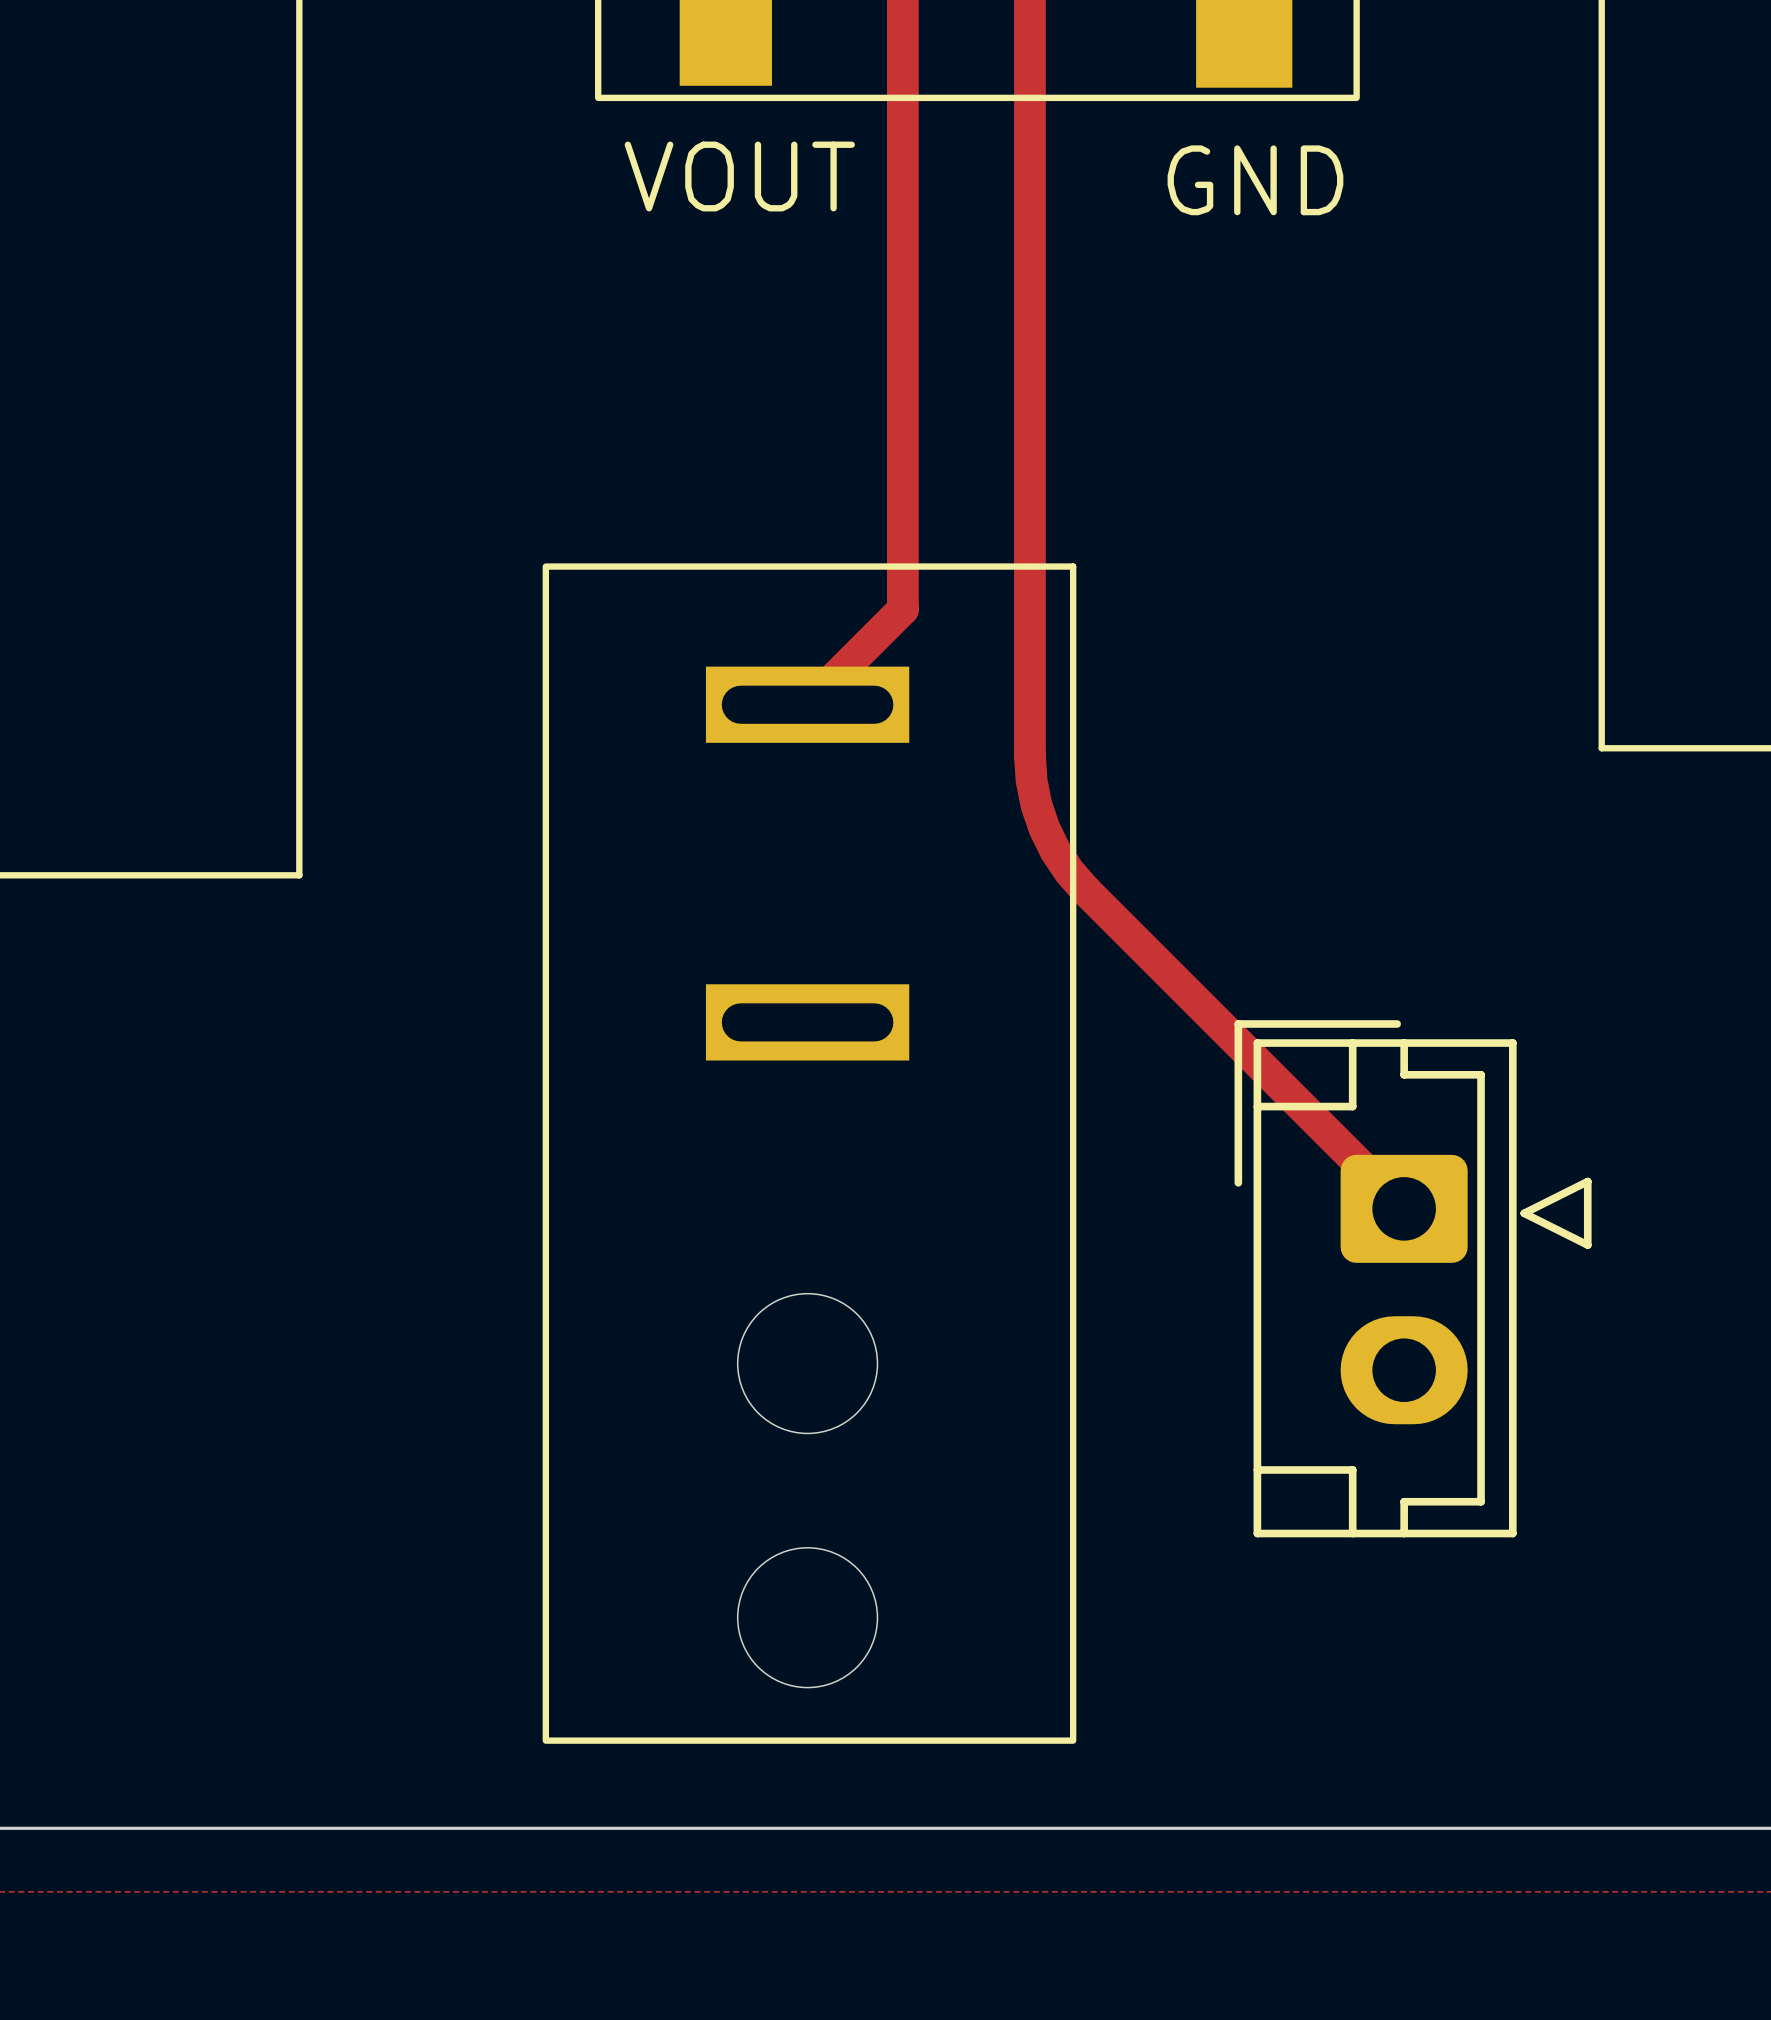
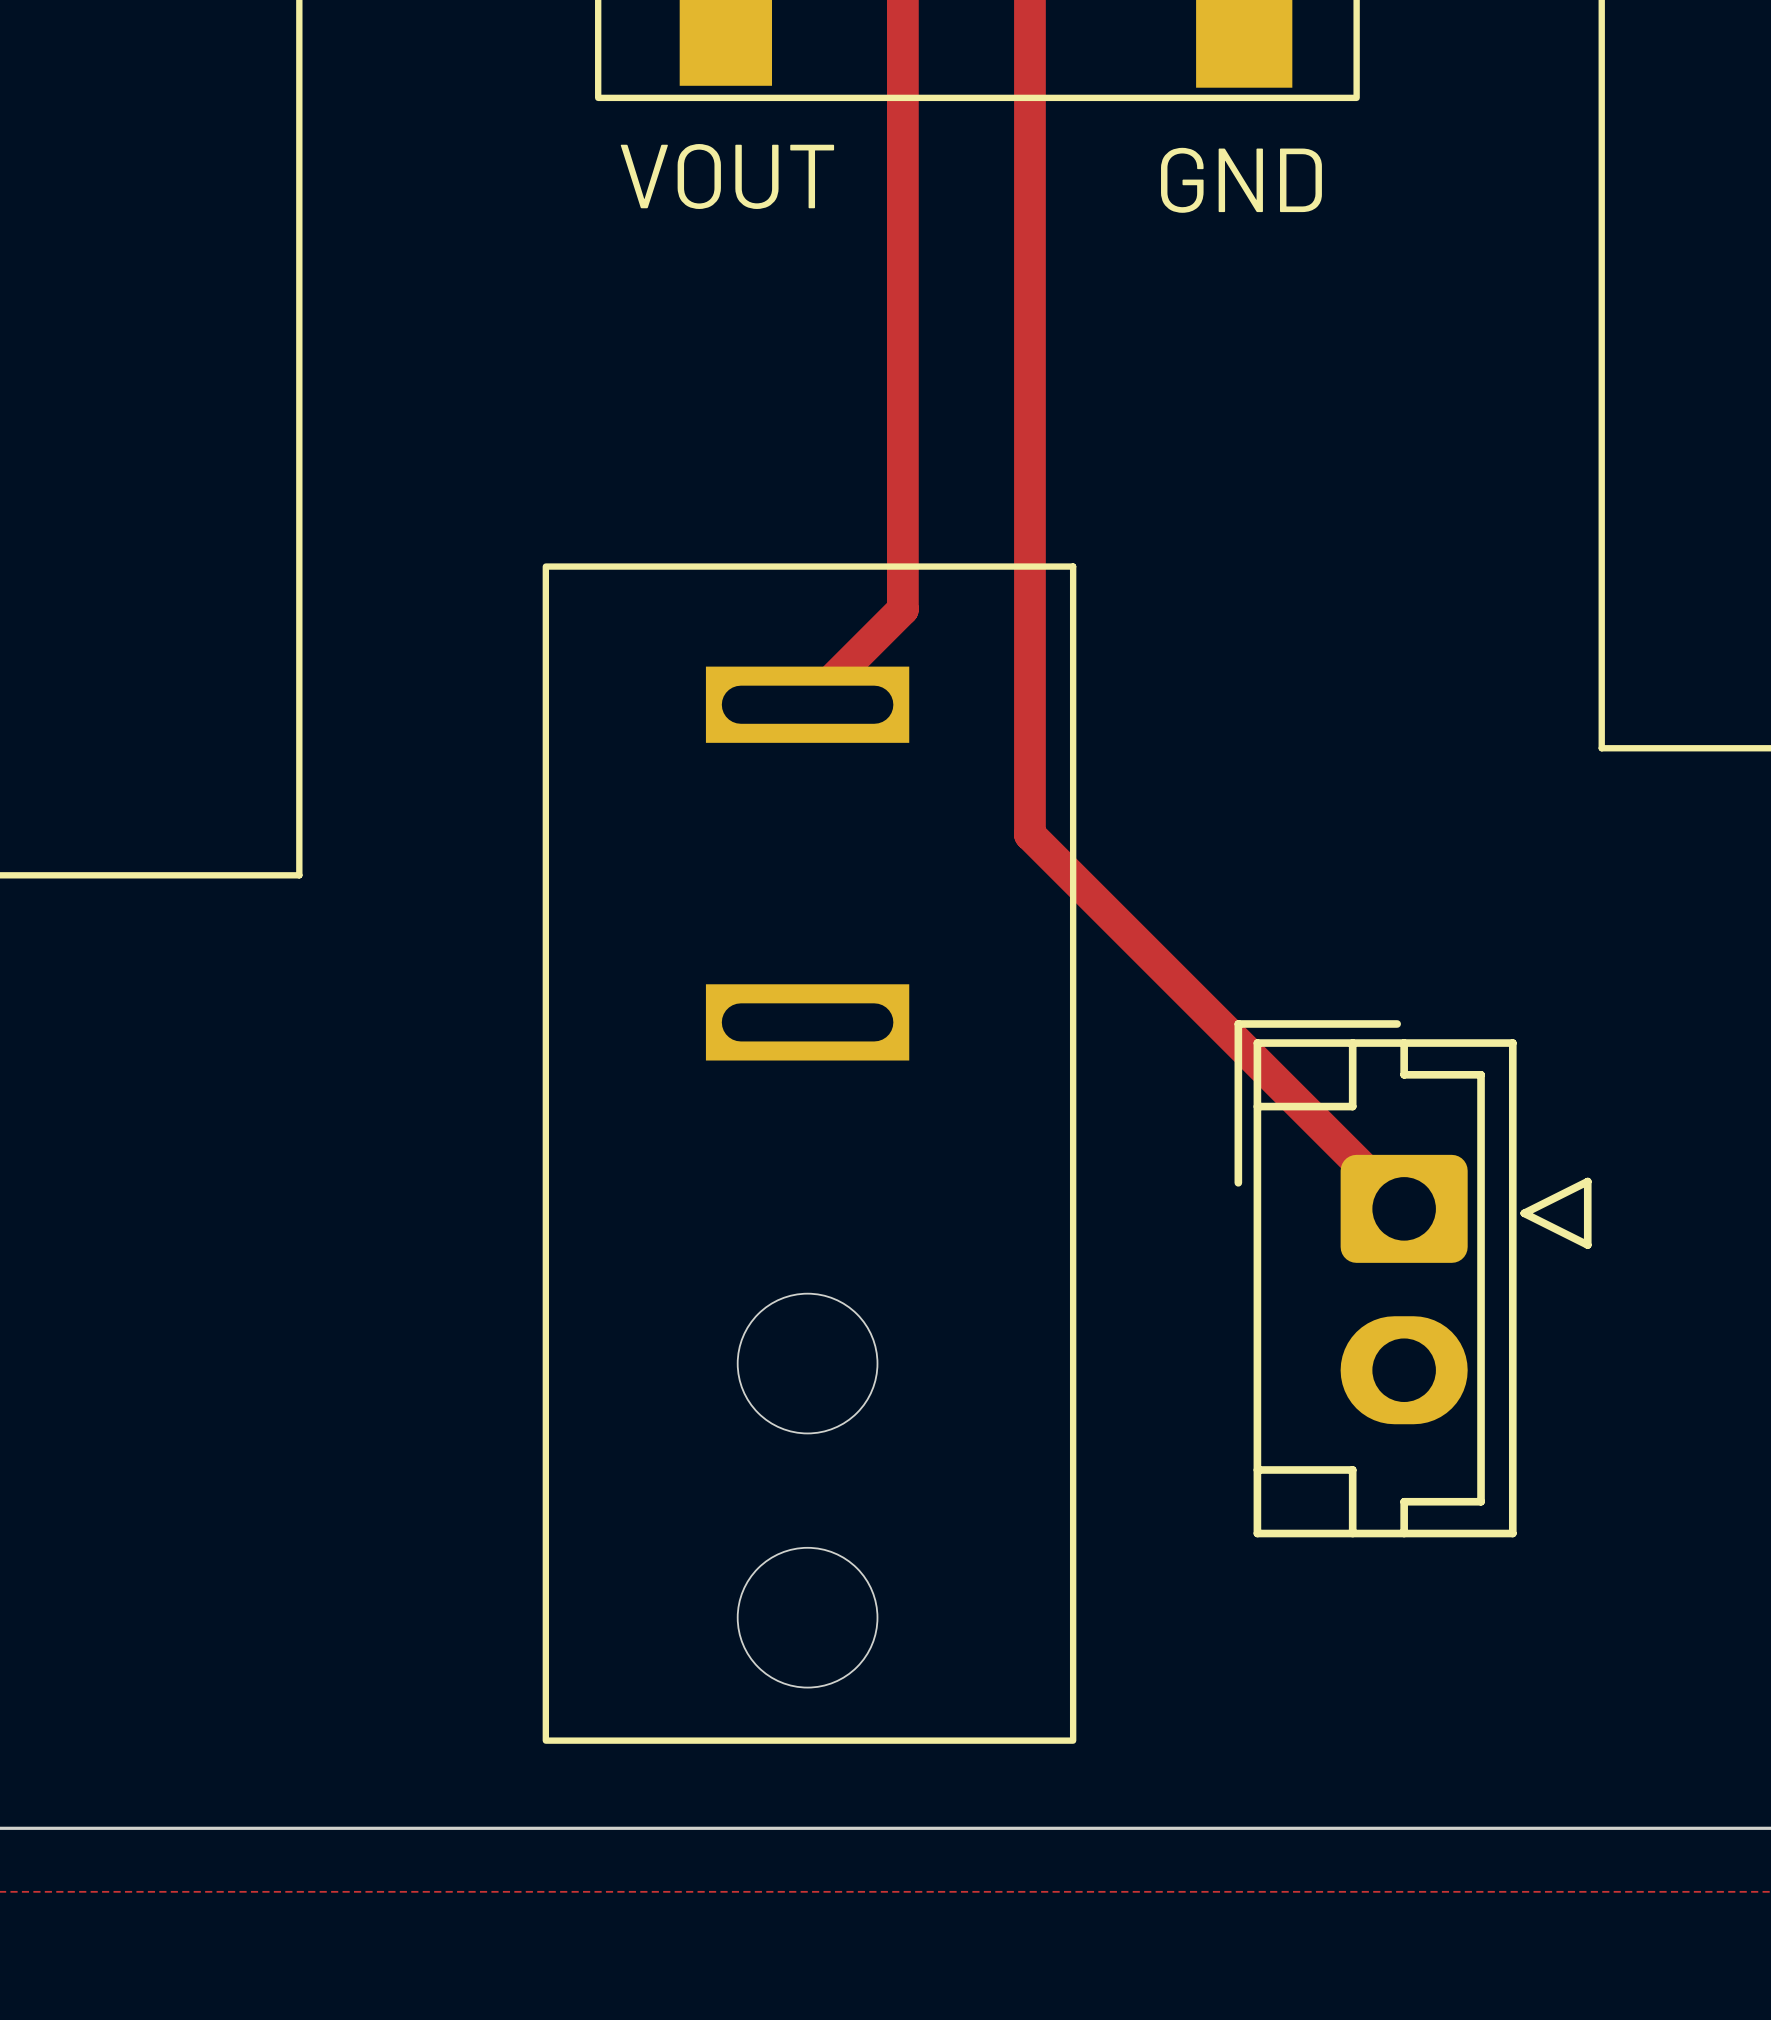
track: (1029, 755) (1031, 780) (1036, 805) (1044, 828) (1055, 851) (1069, 871) (1085, 890) -> (1029, 755) (1029, 834) (1085, 890)

